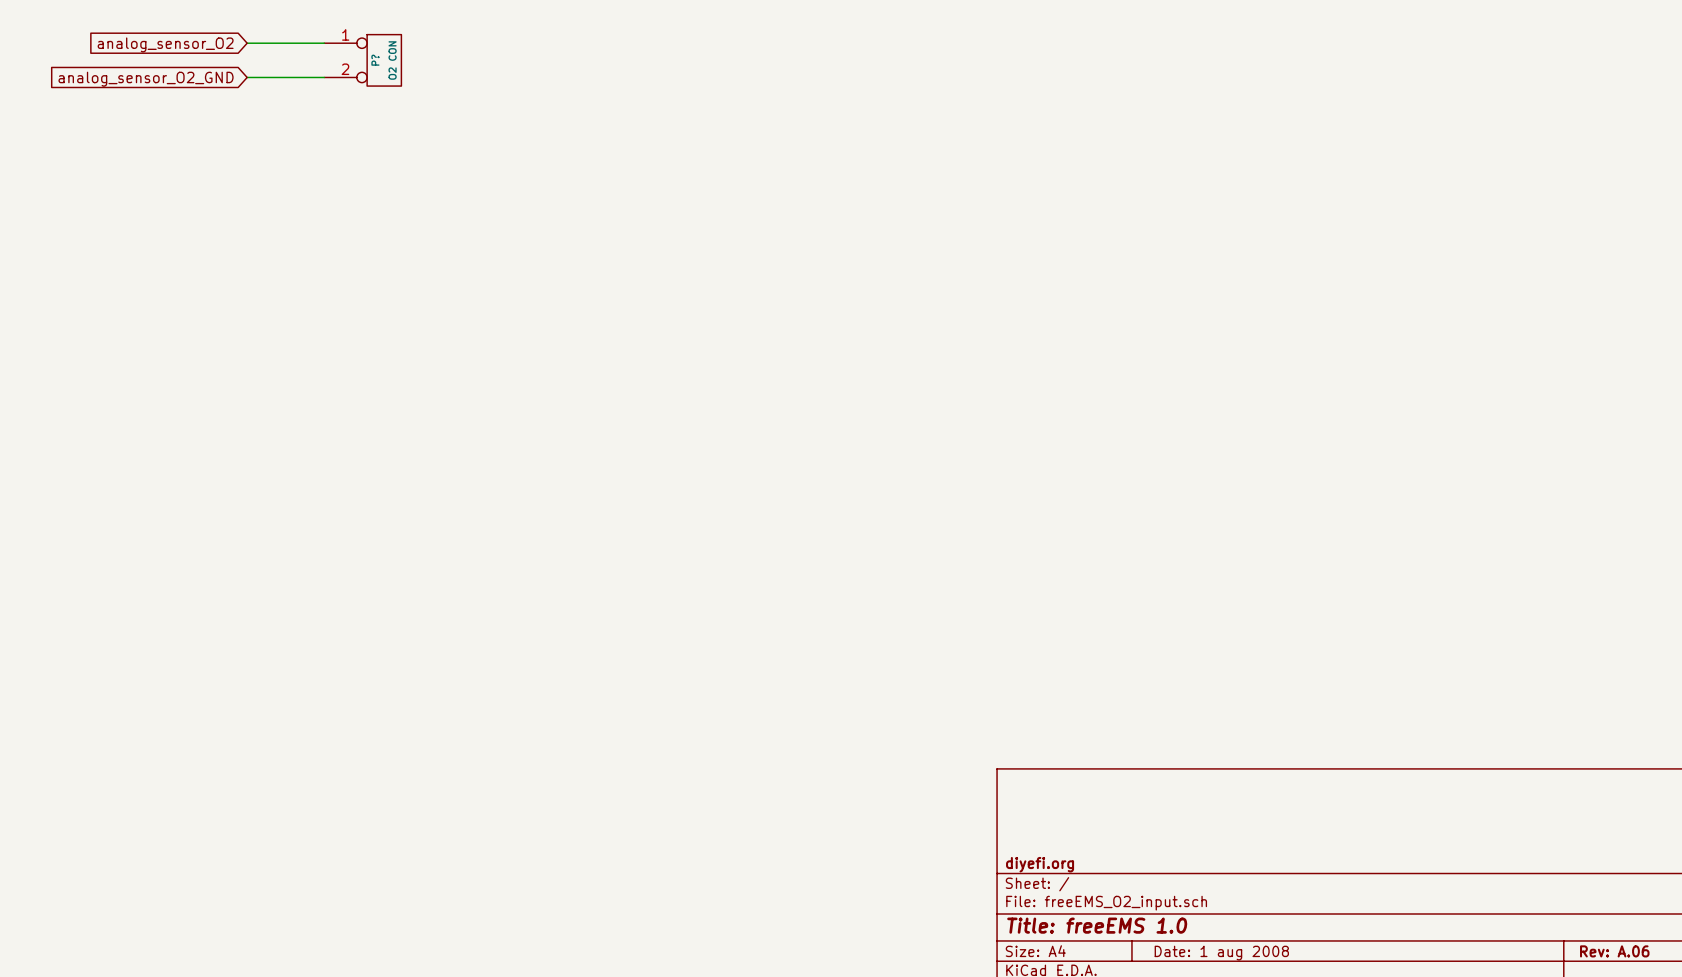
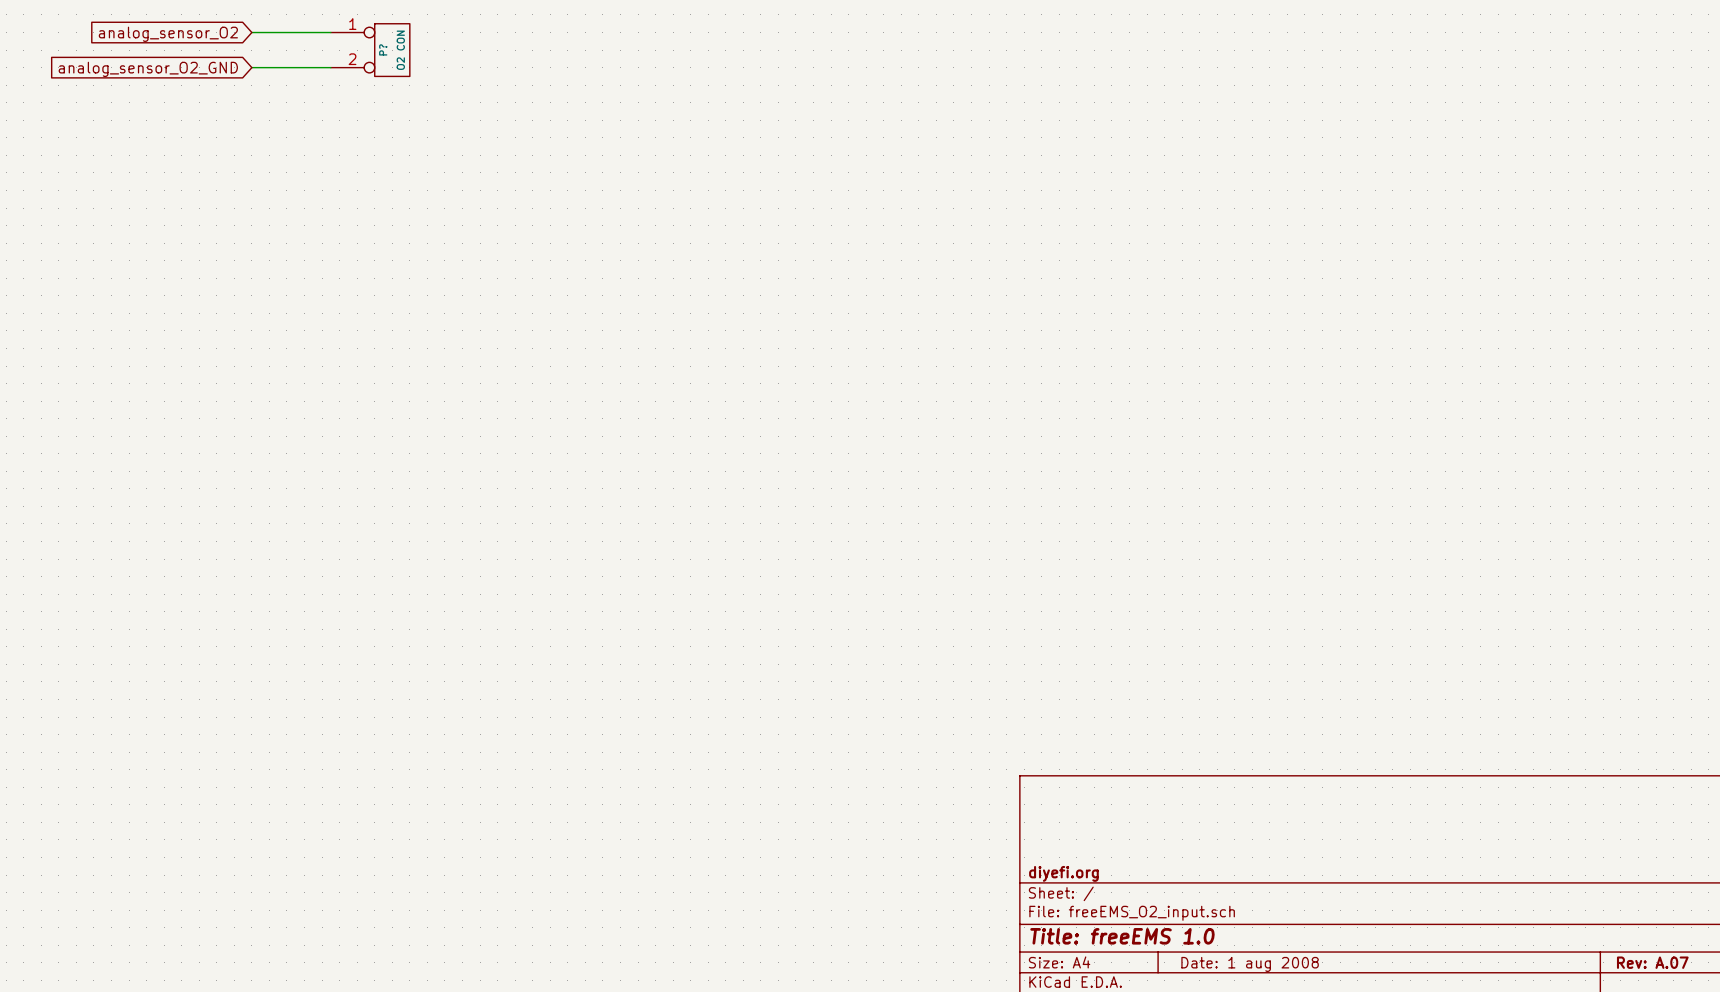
title block: Rev: A.06 (1614, 951) -> Rev: A.07 (1652, 962)

